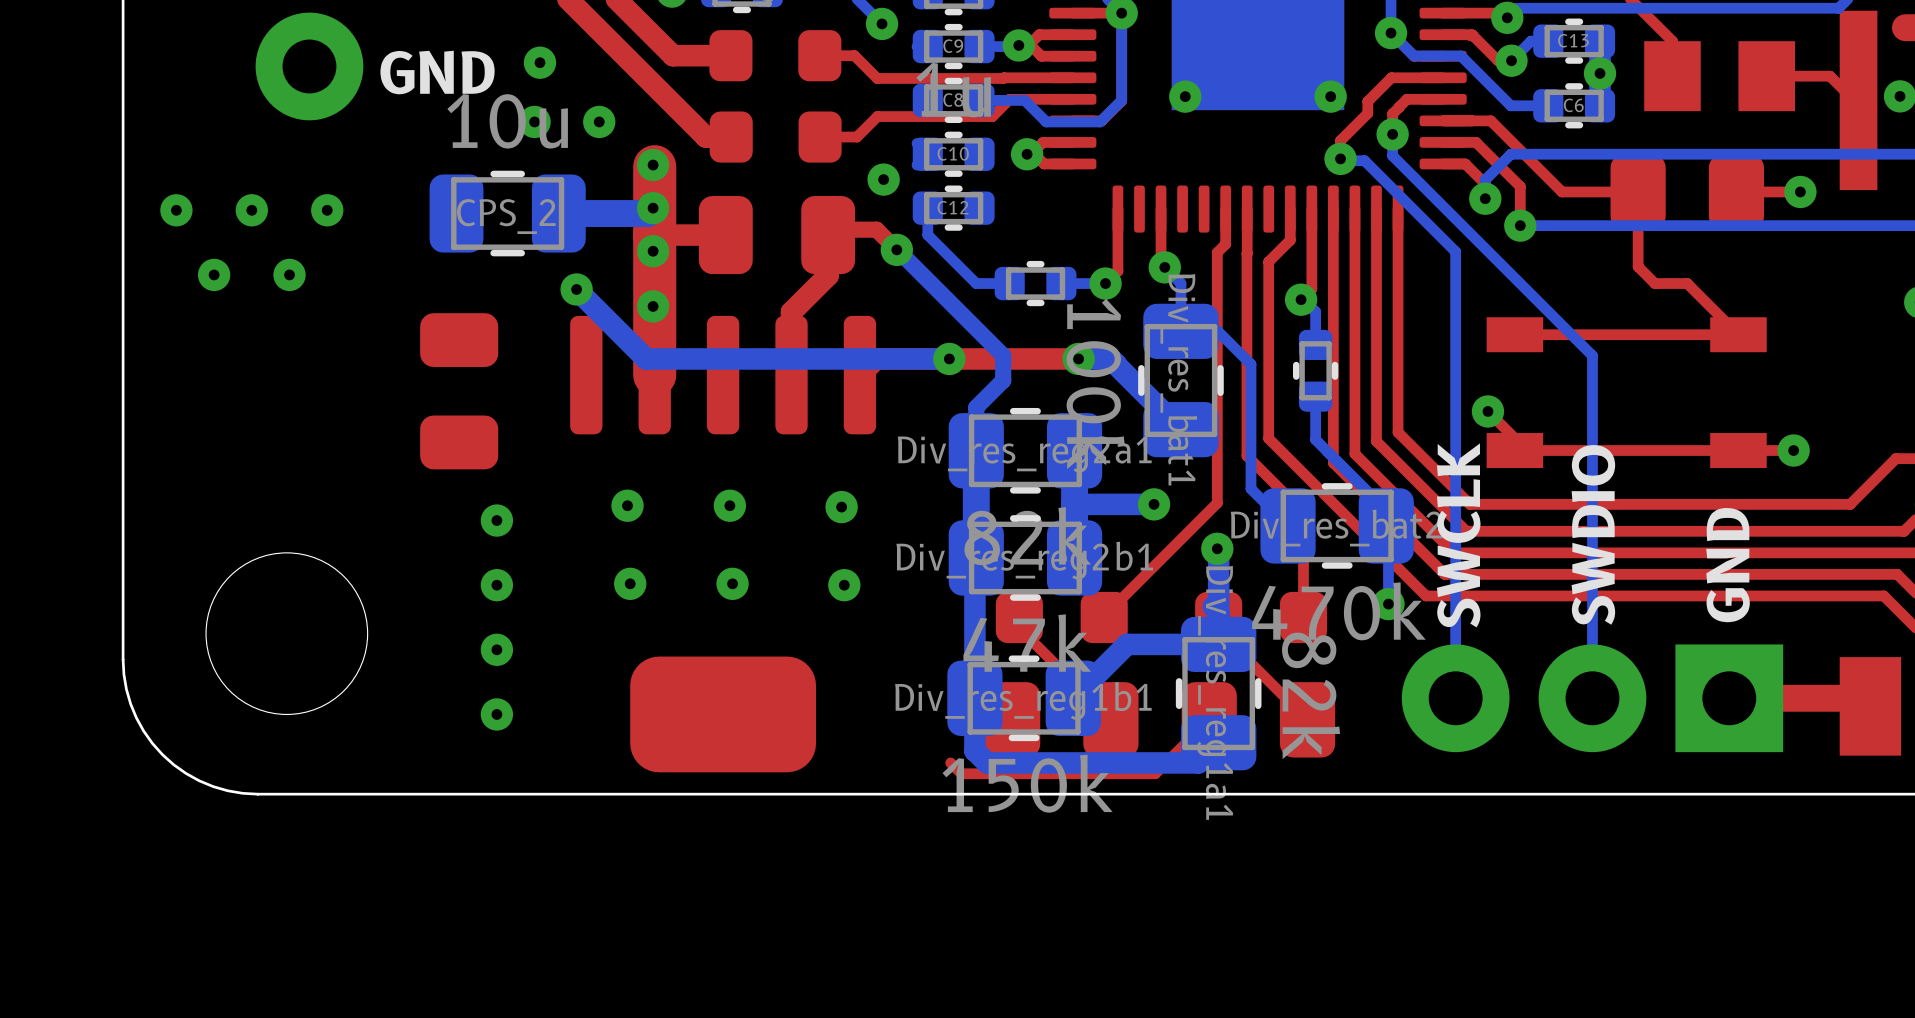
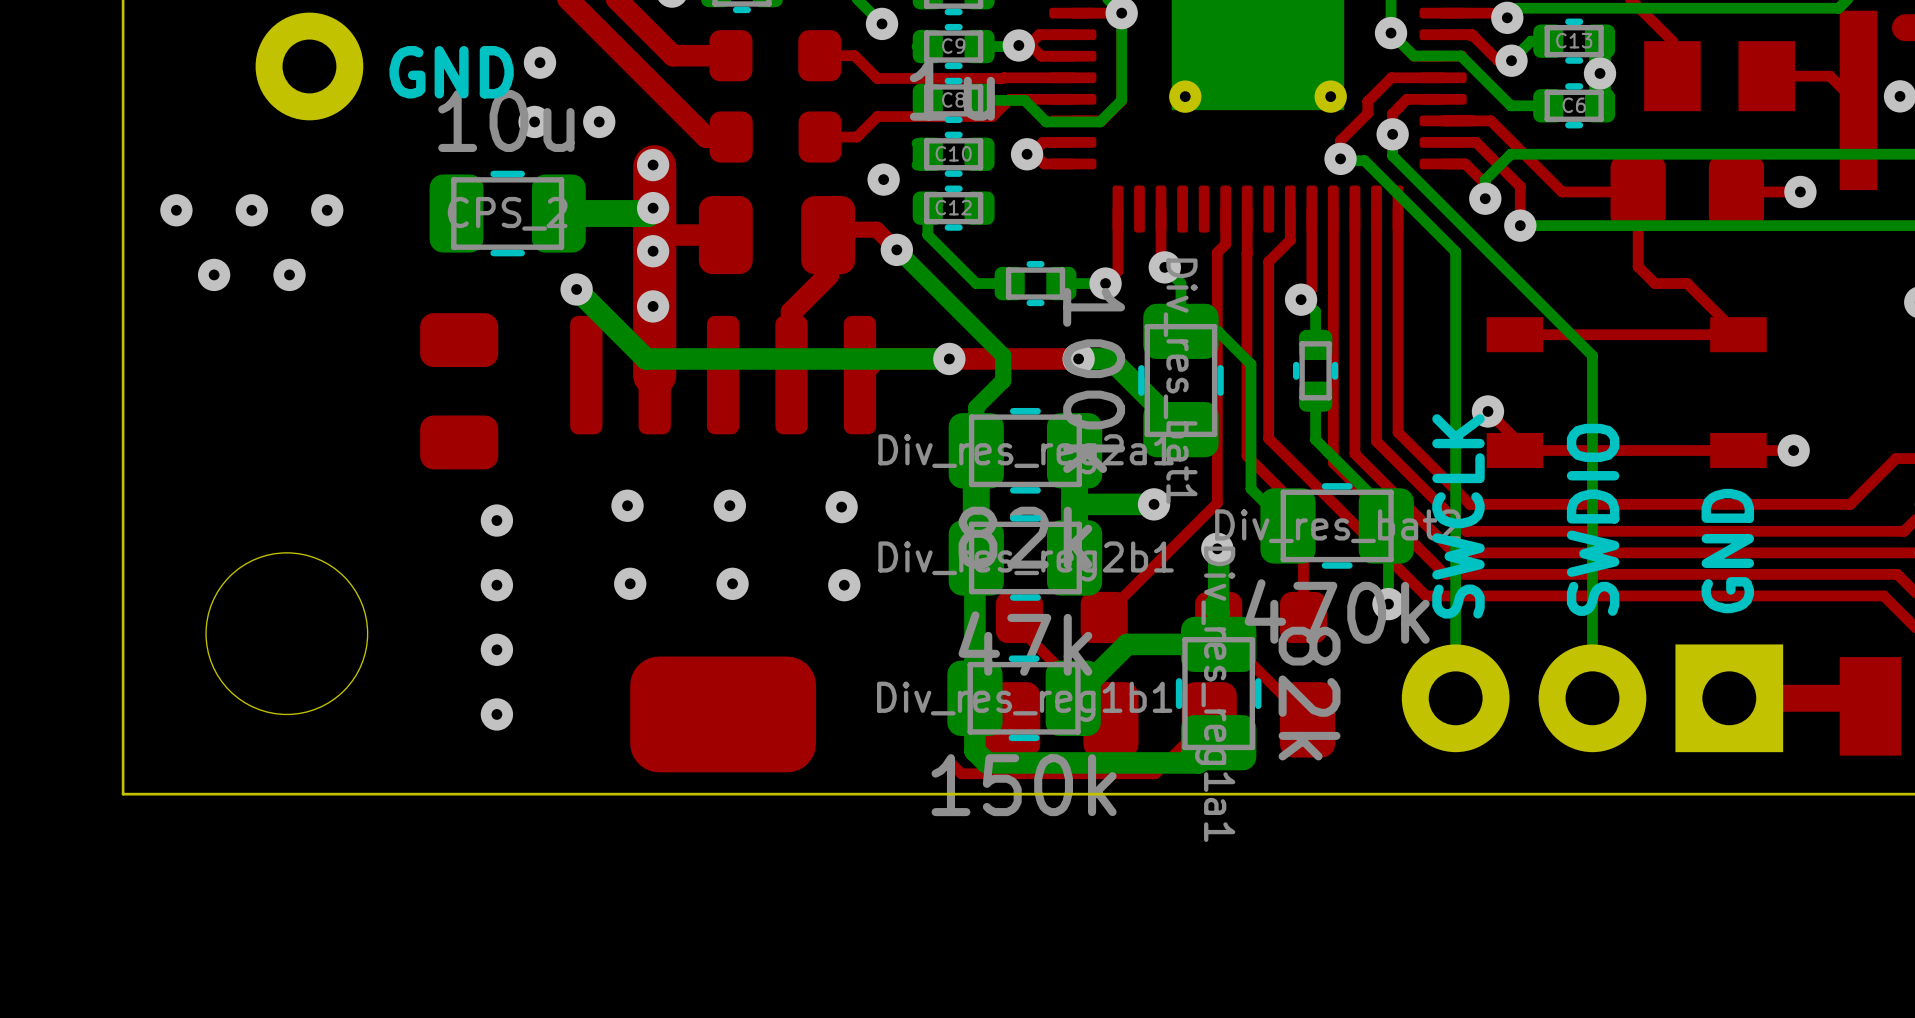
board edge: (123, 659) (126, 689) (136, 717) (152, 743) (162, 754) (186, 773) (199, 780) (227, 790) (257, 794) -> (123, 659) (123, 794) (257, 794)

